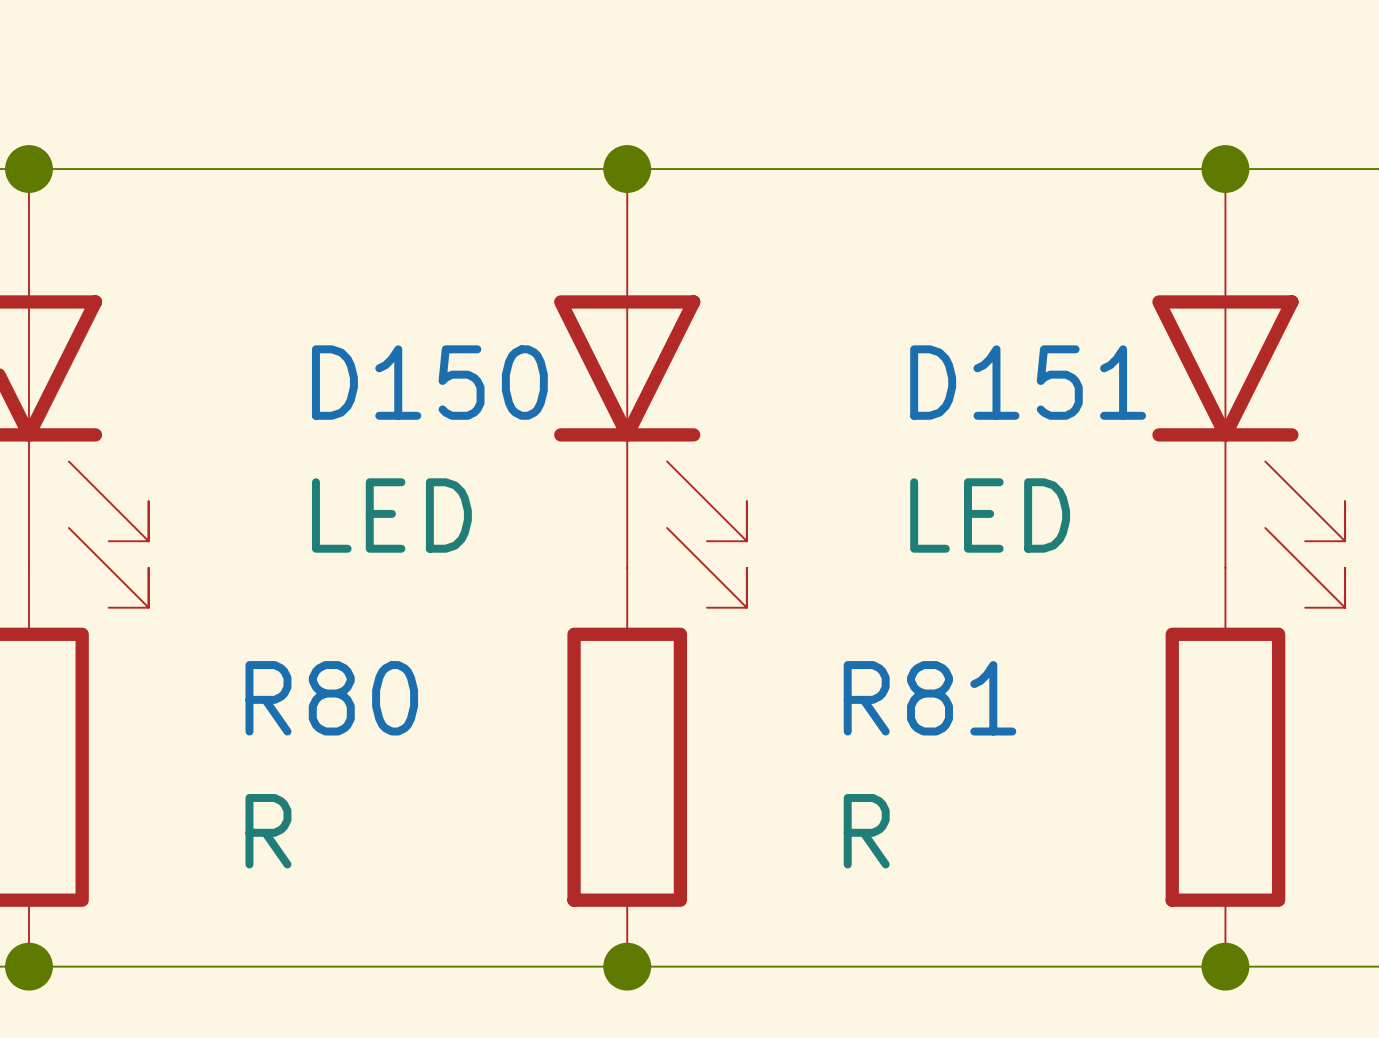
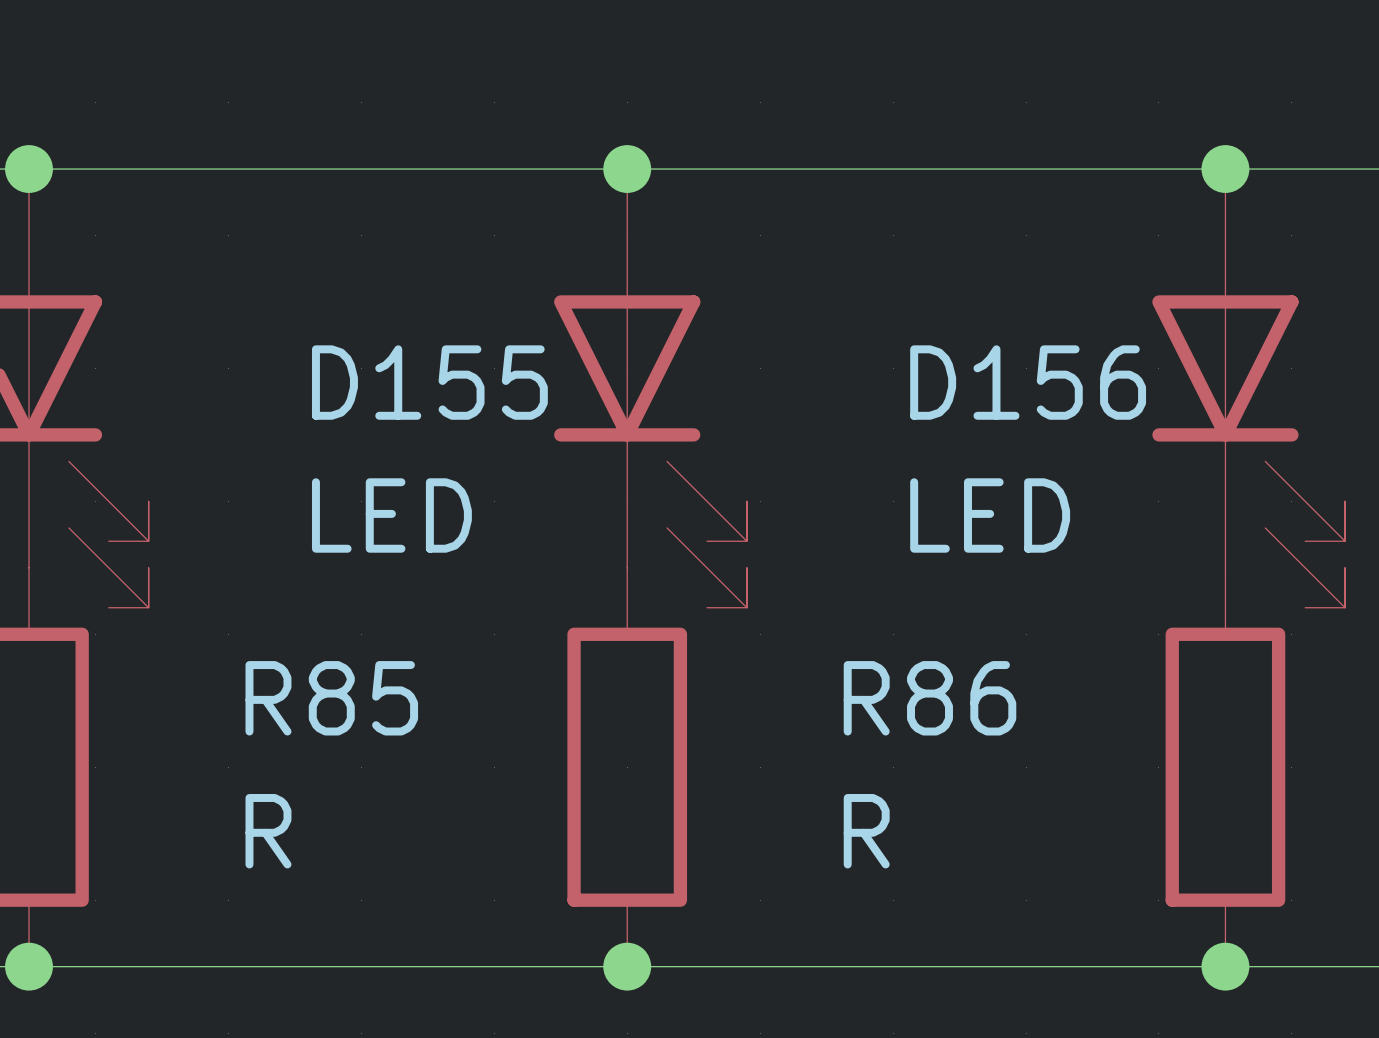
D150 name: D150 (429, 382) -> D155 (429, 382)
D151 name: D151 (1028, 382) -> D156 (1028, 382)
R80 name: R80 (331, 698) -> R85 (331, 698)
R81 name: R81 (930, 698) -> R86 (930, 698)

